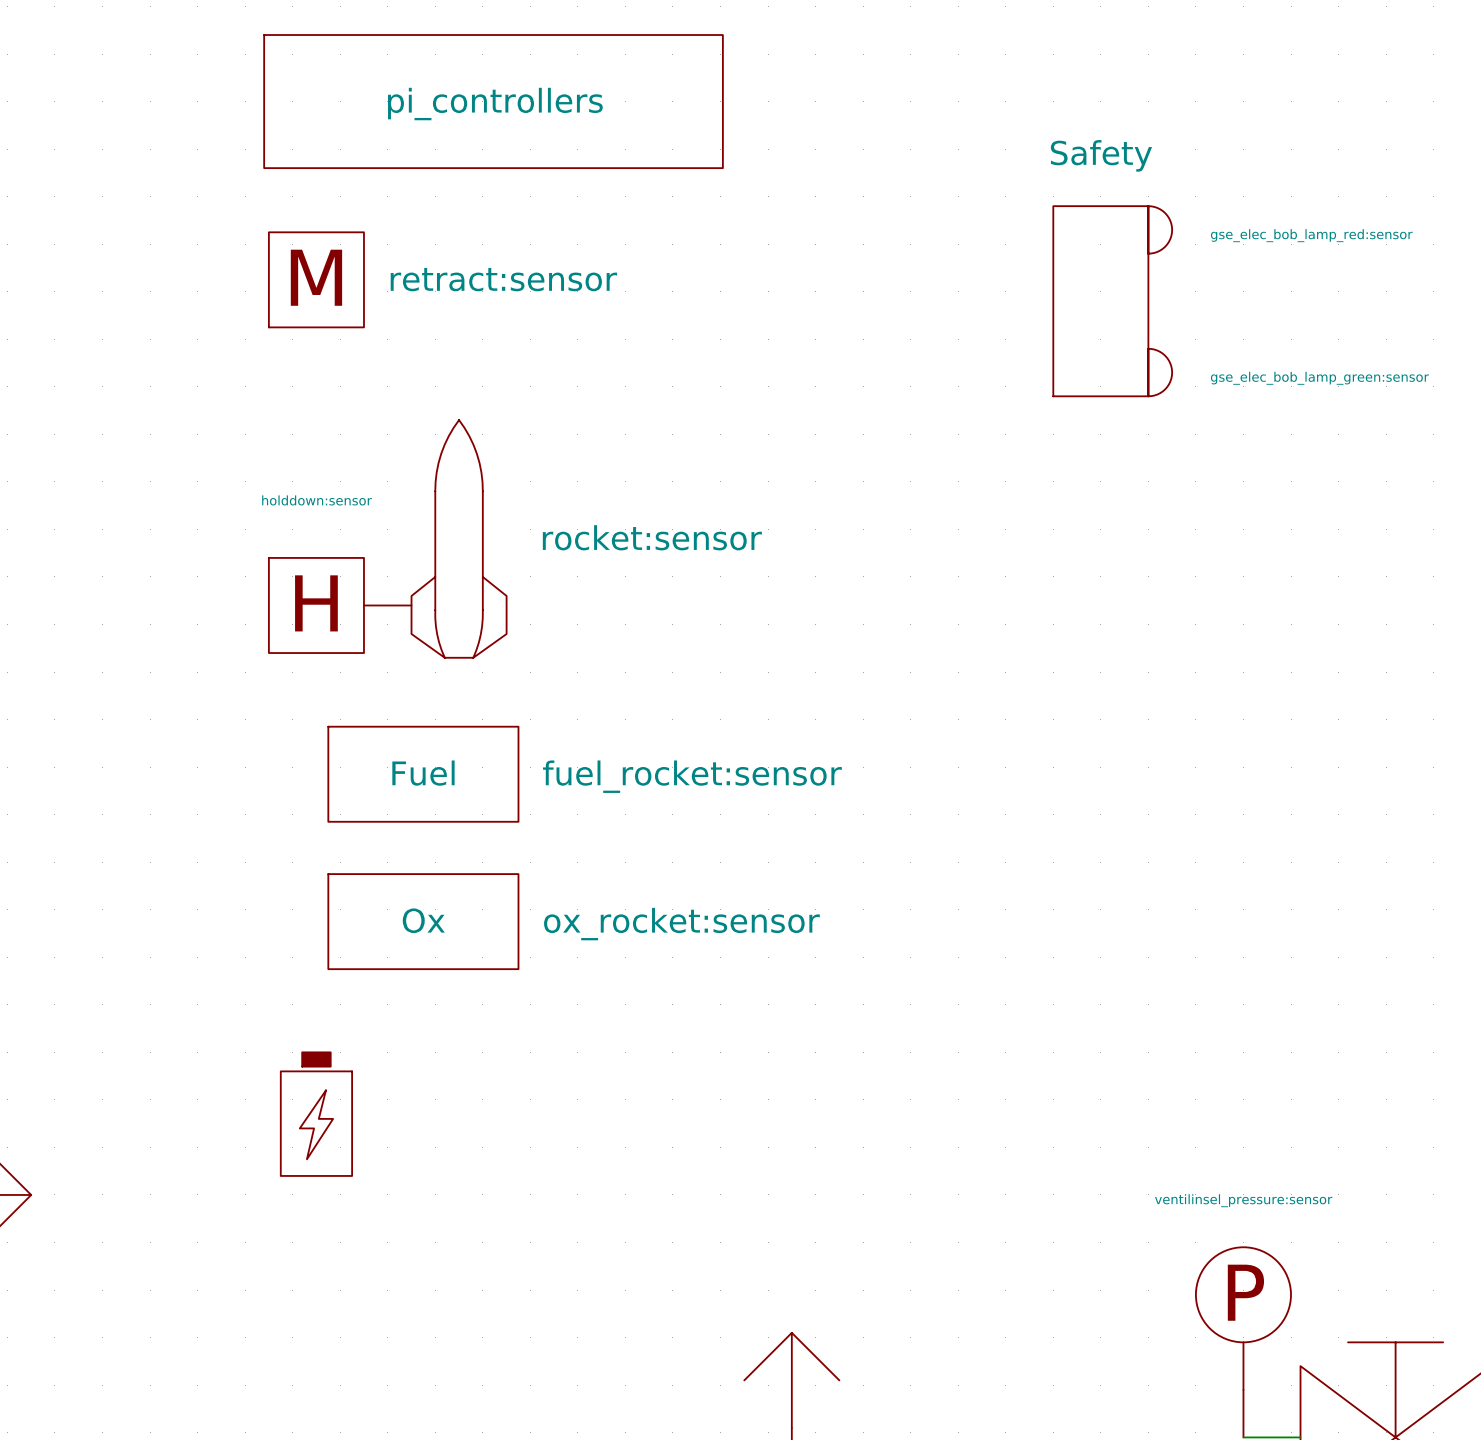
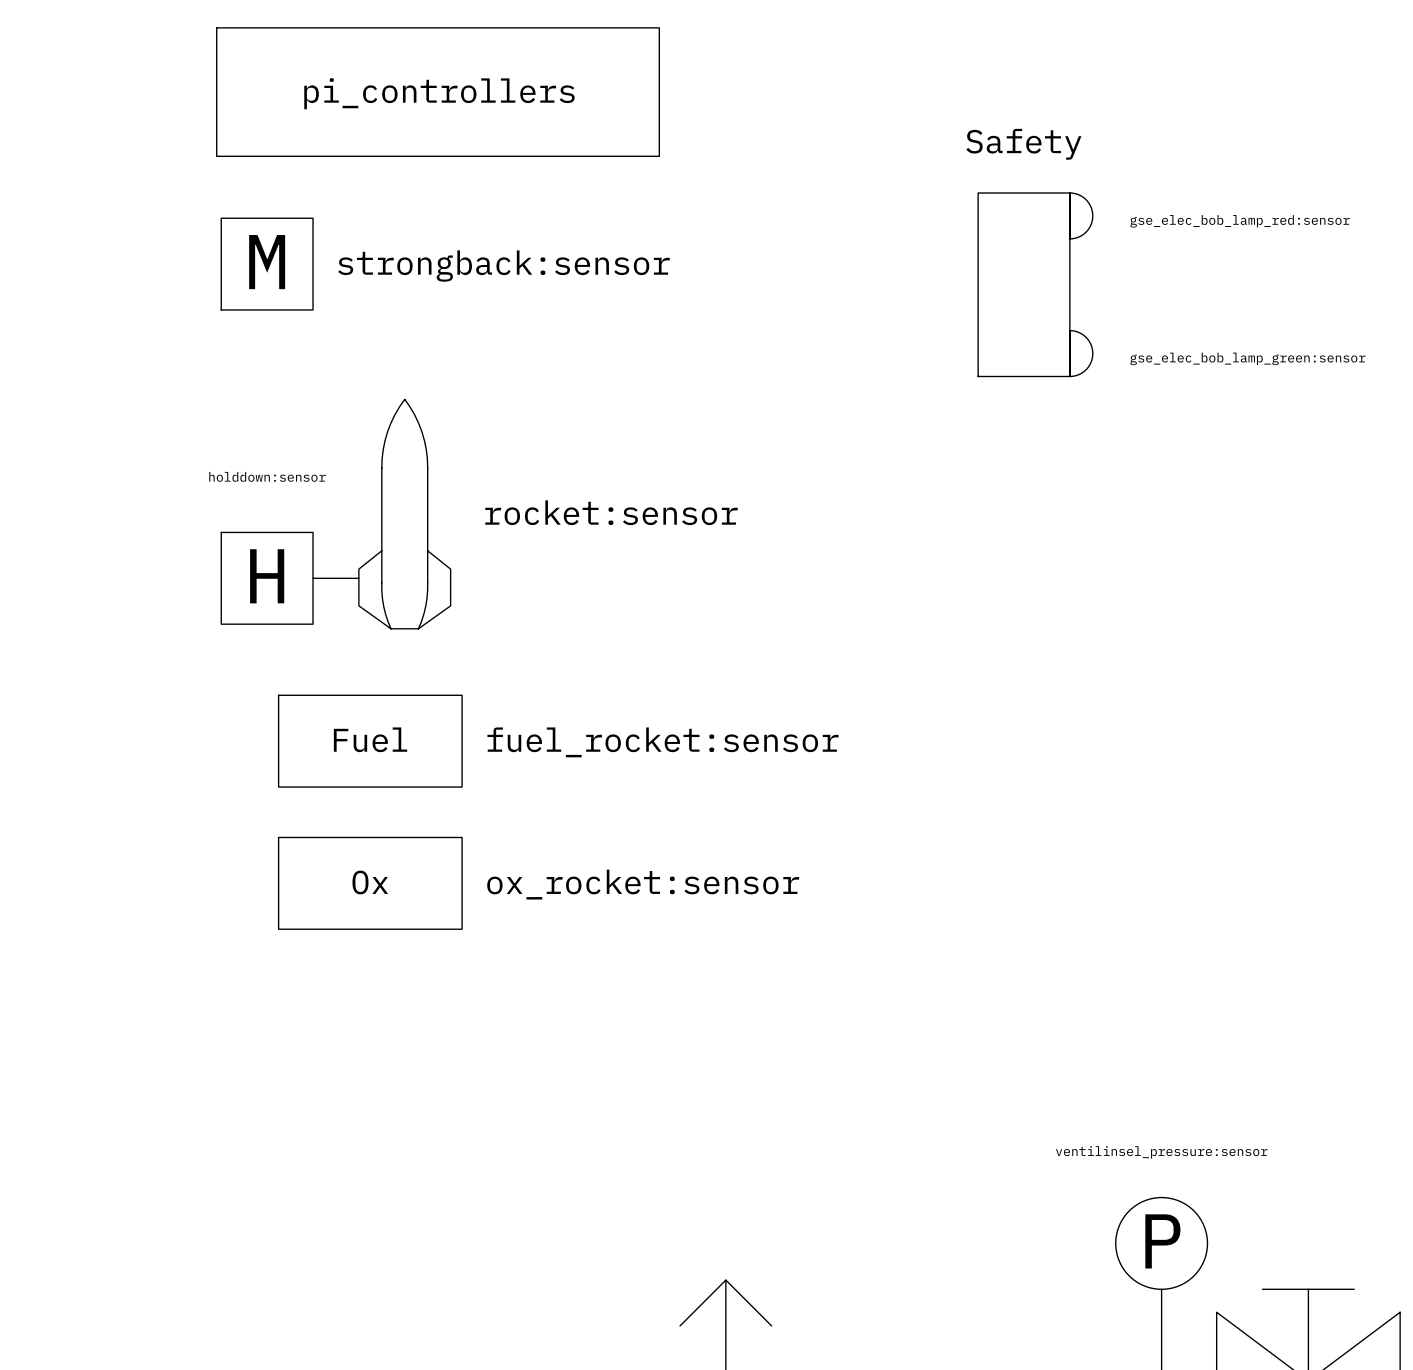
part value: retract:sensor (503, 279) -> strongback:sensor (503, 266)
part: (316, 1114) -> none

